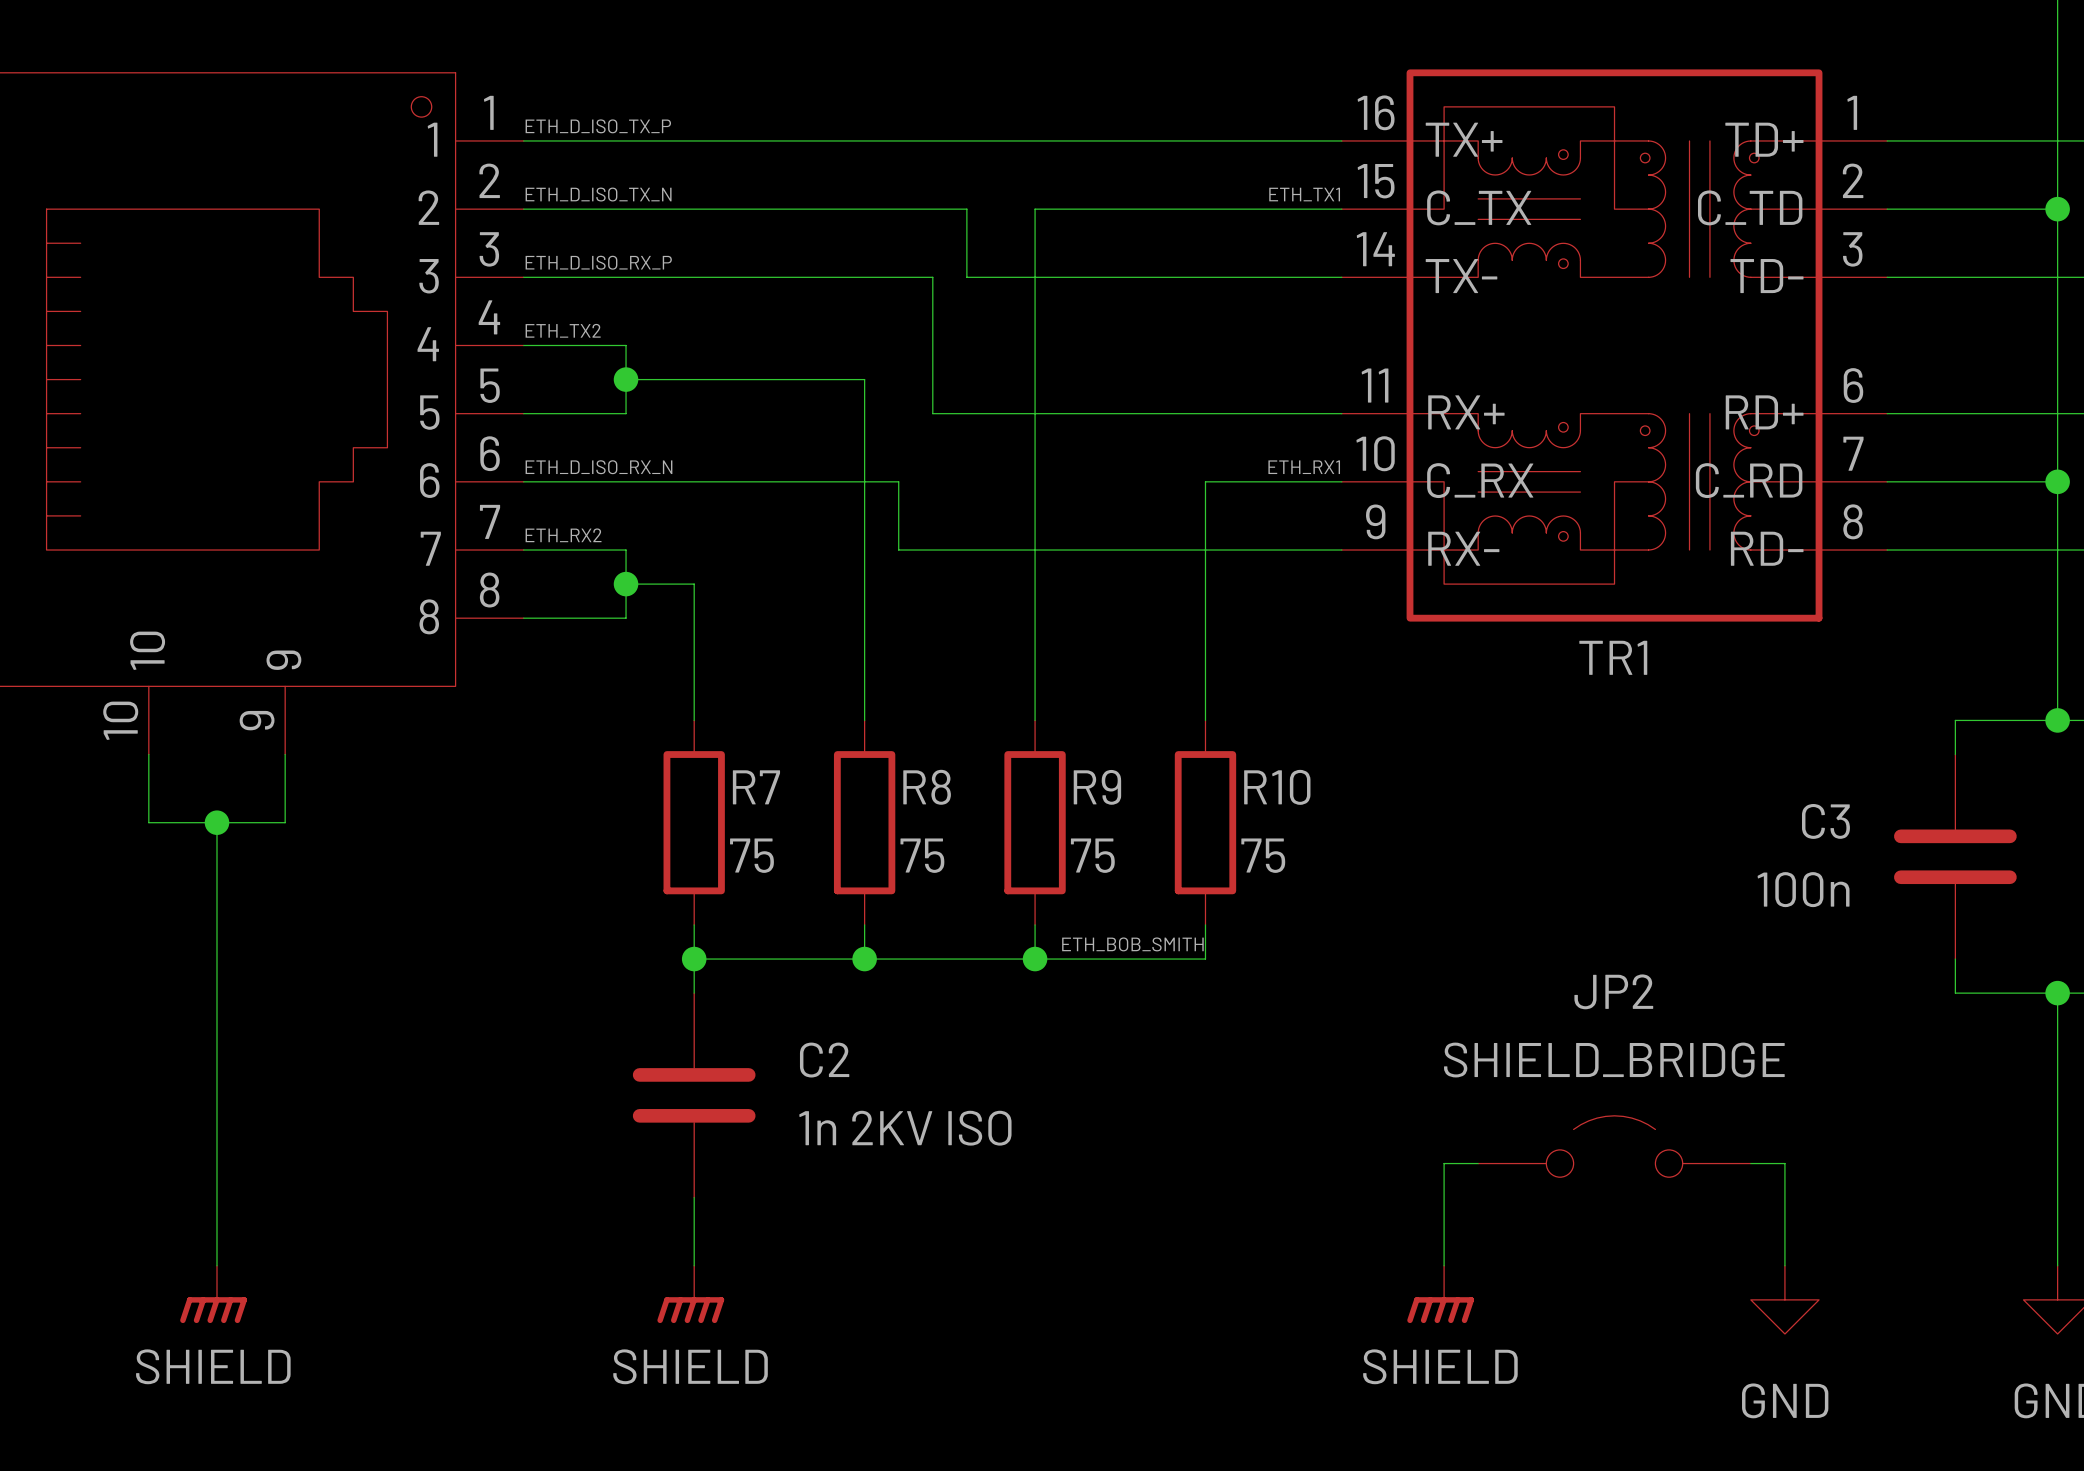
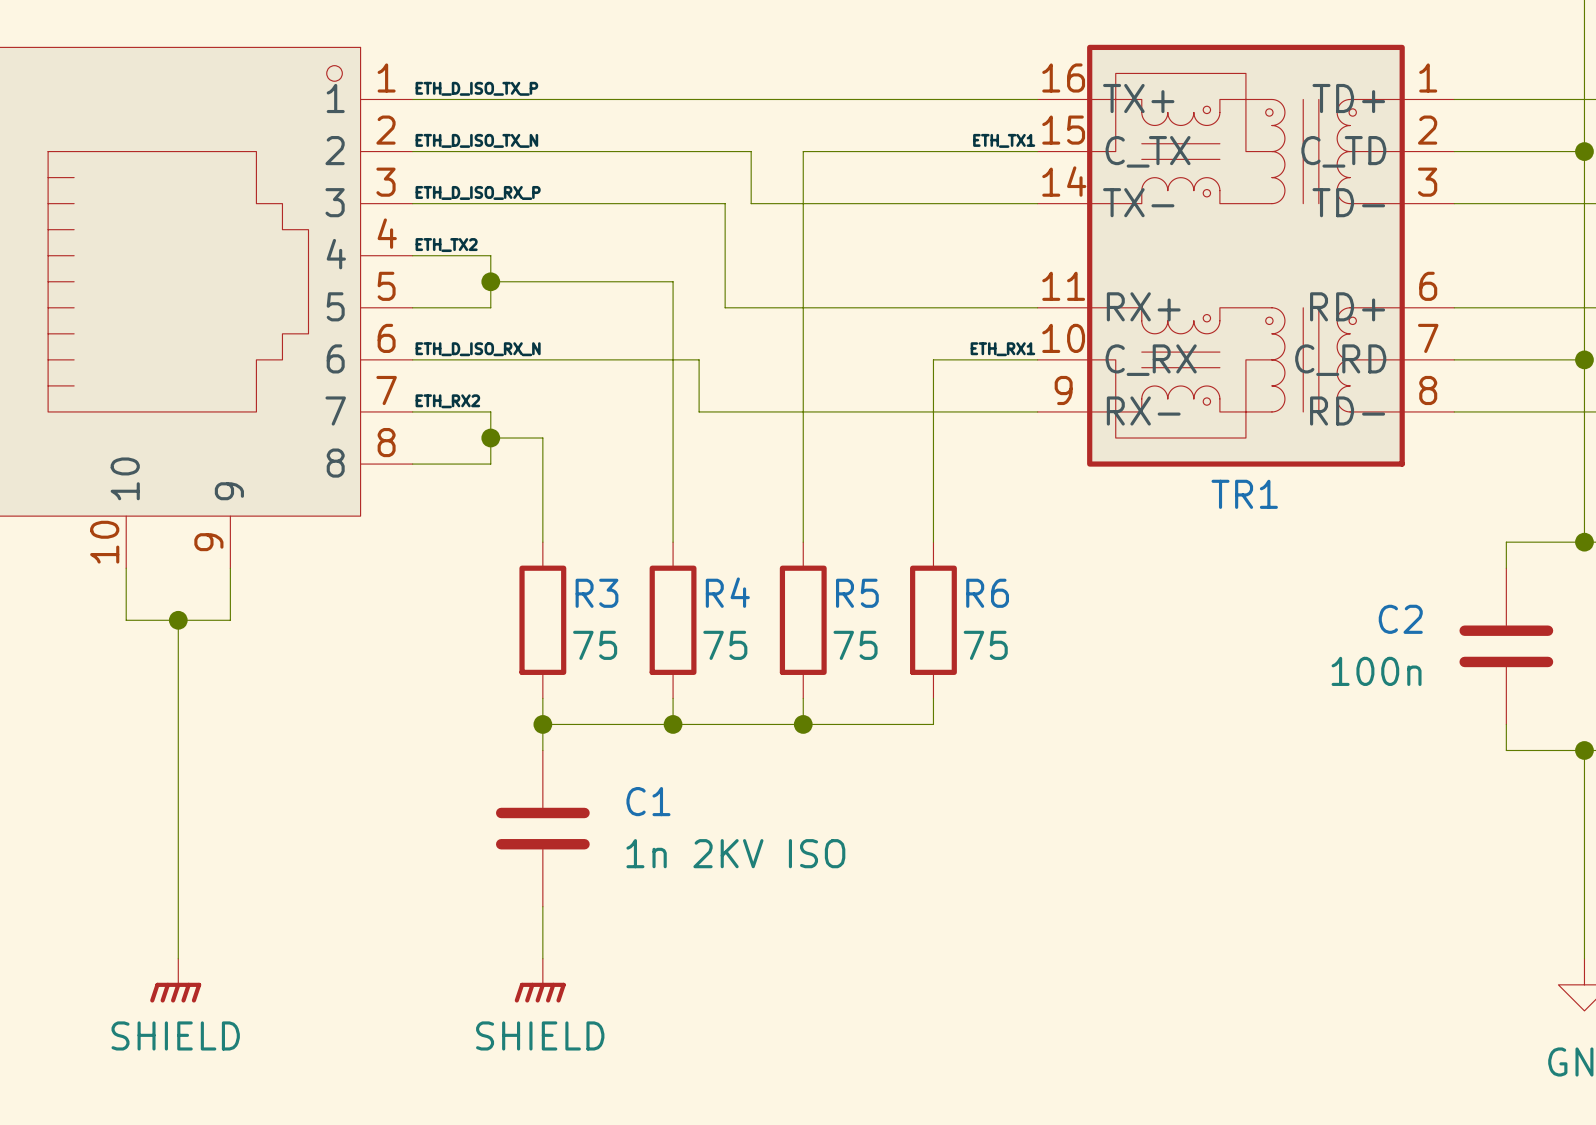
R7 name: R7 (756, 787) -> R3 (596, 593)
R8 name: R8 (927, 787) -> R4 (727, 592)
R9 name: R9 (1097, 787) -> R5 (857, 593)
R10 name: R10 (1277, 787) -> R6 (987, 593)
C3 name: C3 (1825, 821) -> C2 (1400, 619)
label: ETH_BOB_SMITH (1132, 944) -> none
C2 name: C2 (824, 1060) -> C1 (648, 801)
JP2: SHIELD_BRIDGE (1614, 1146) -> none
wire: (1478, 1163) (1444, 1163) (1444, 1265) -> none
wire: (1750, 1163) (1784, 1163) (1784, 1265) -> none
power symbol: SHIELD (1440, 1294) -> none
power symbol: GND (1784, 1299) -> none

